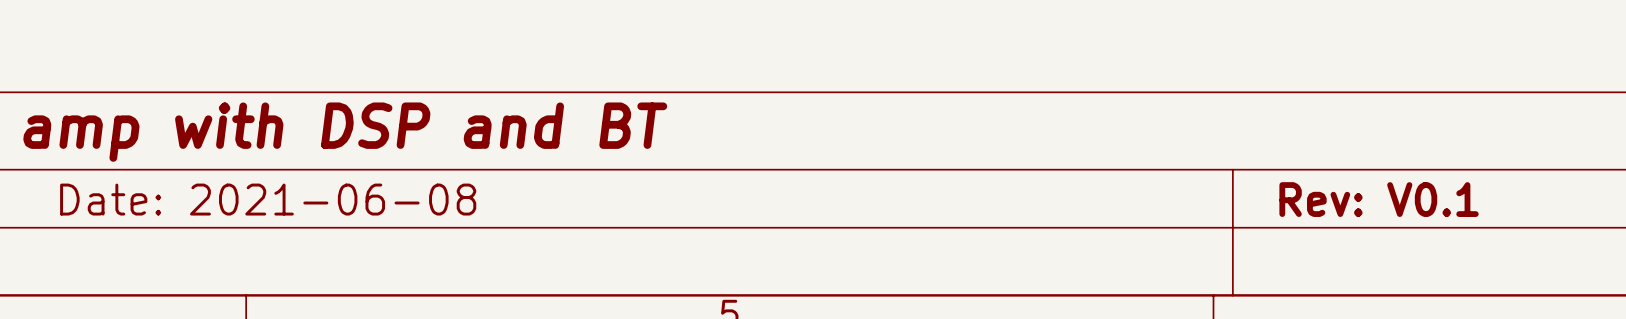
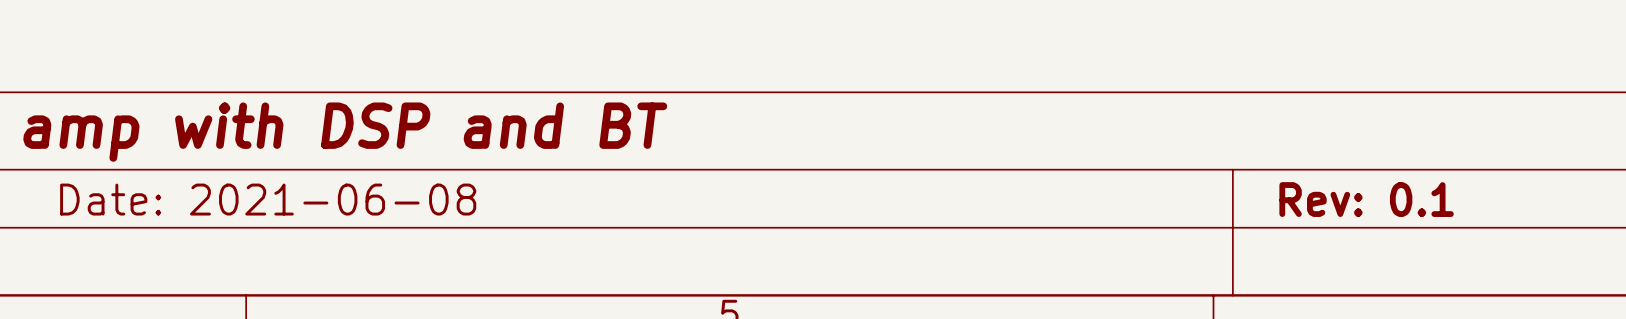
title block: Rev: V0.1 (1379, 199) -> Rev: 0.1 (1366, 199)

